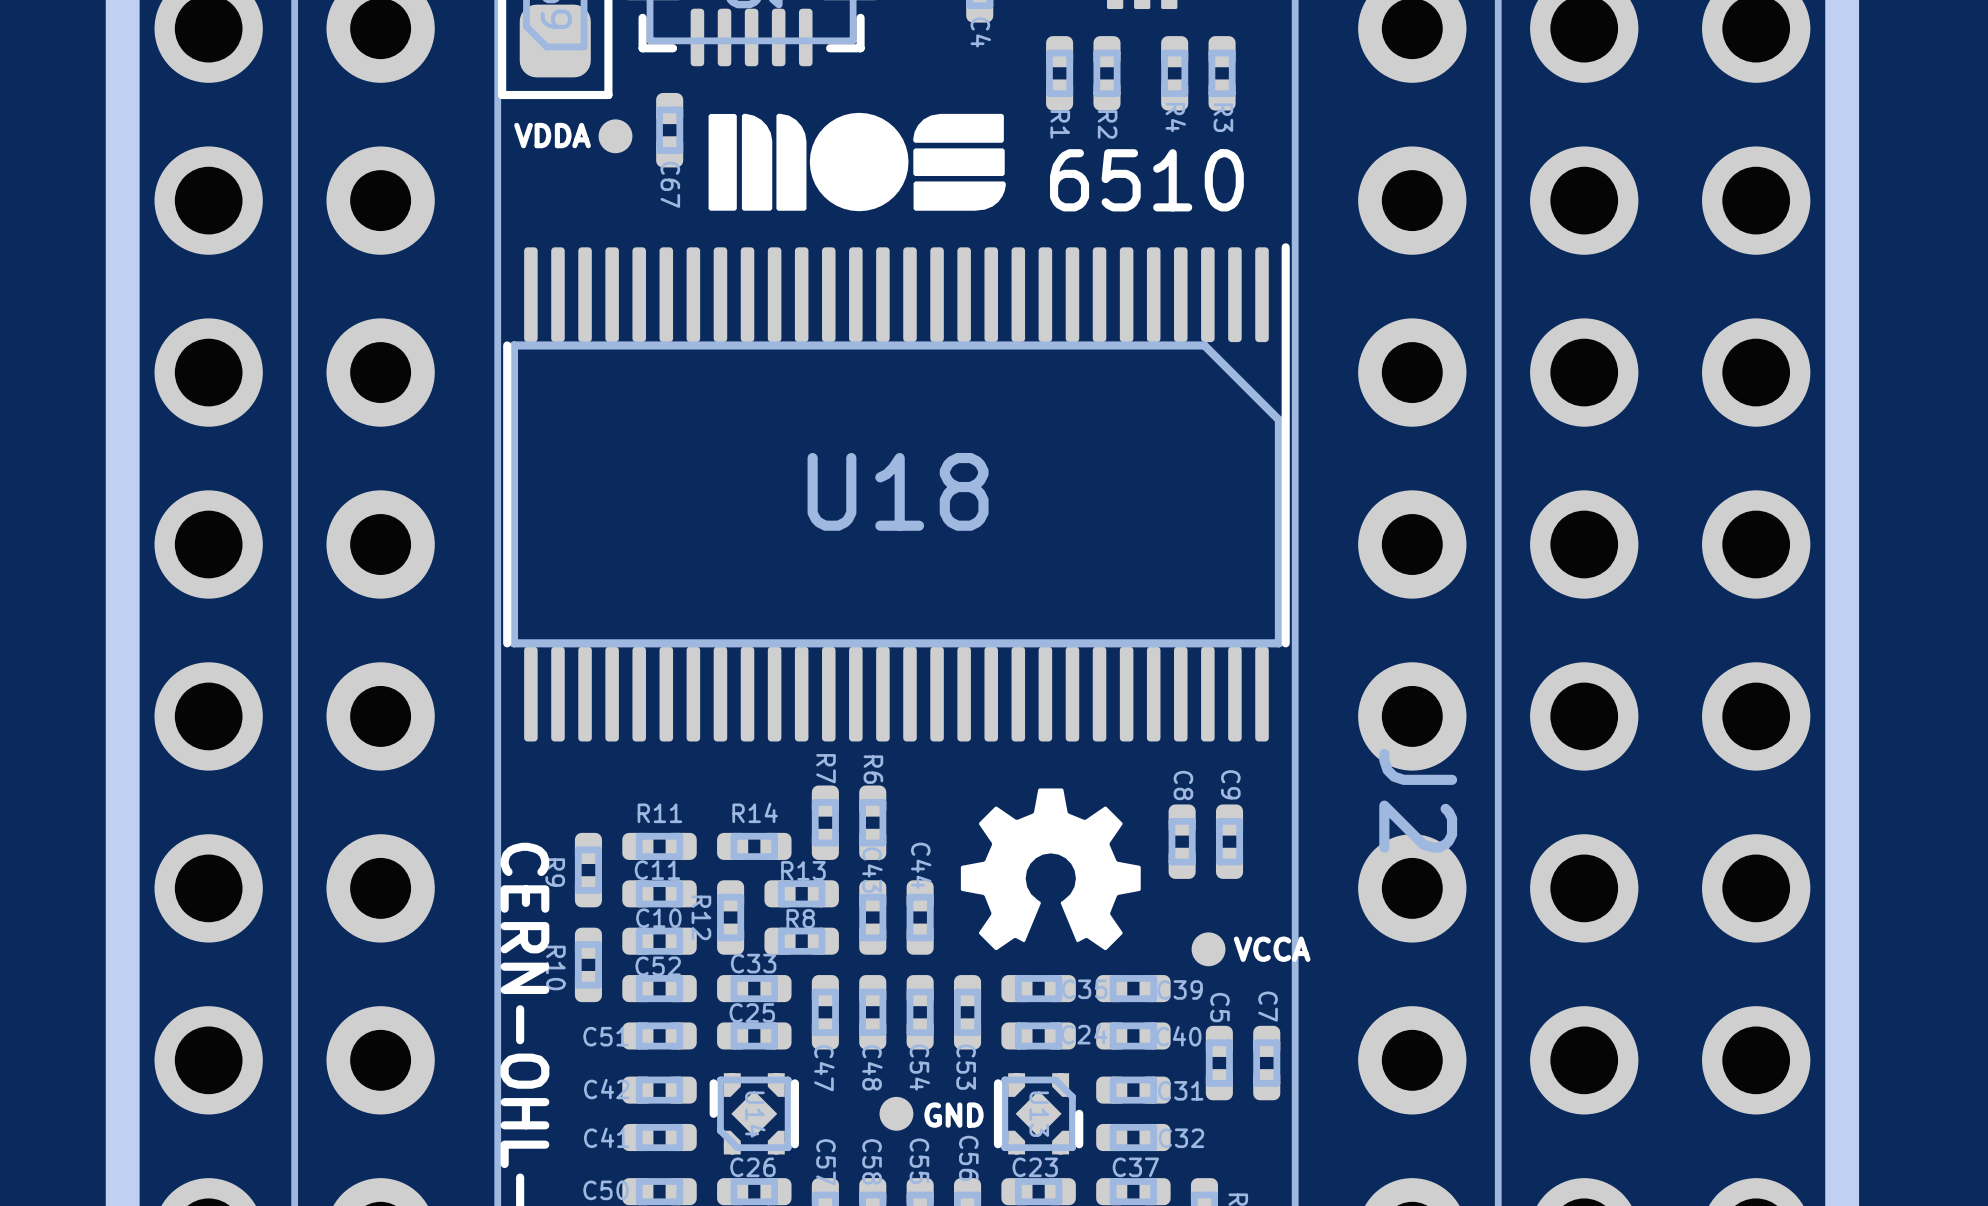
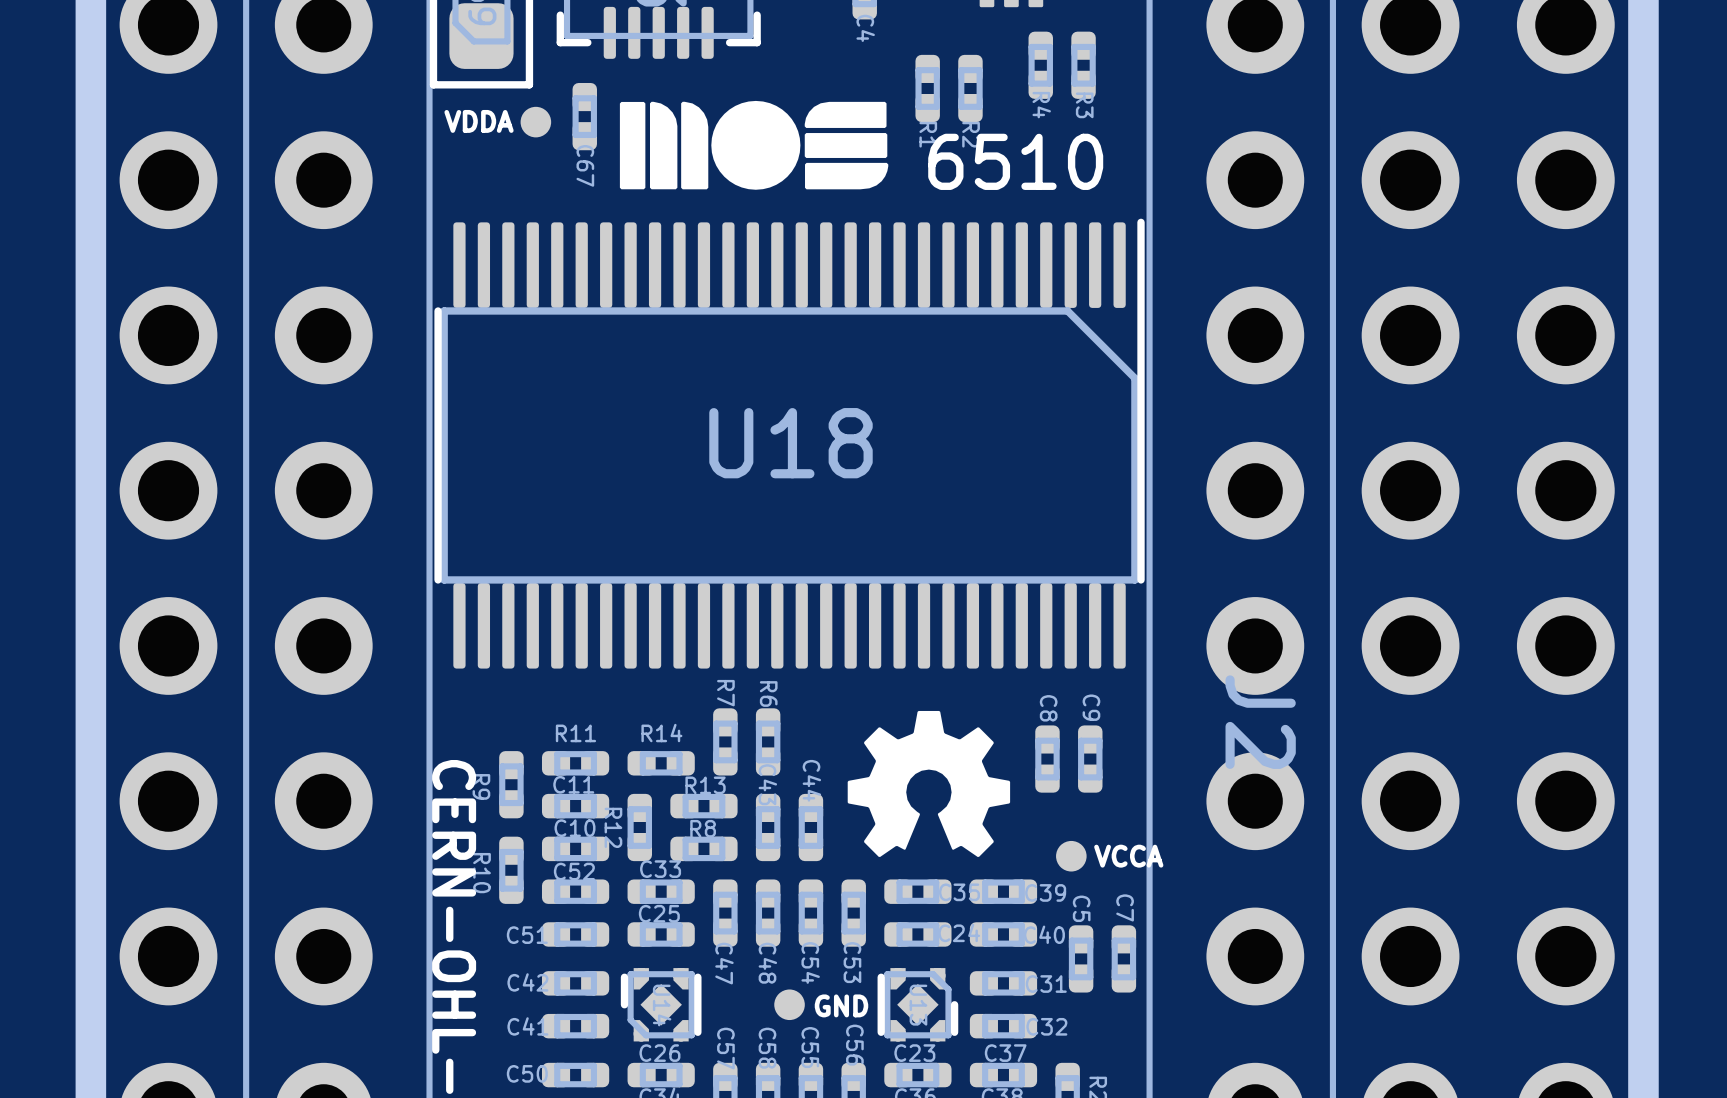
R1 position: (1059, 73) -> (927, 88)
R2 position: (1106, 73) -> (970, 88)

